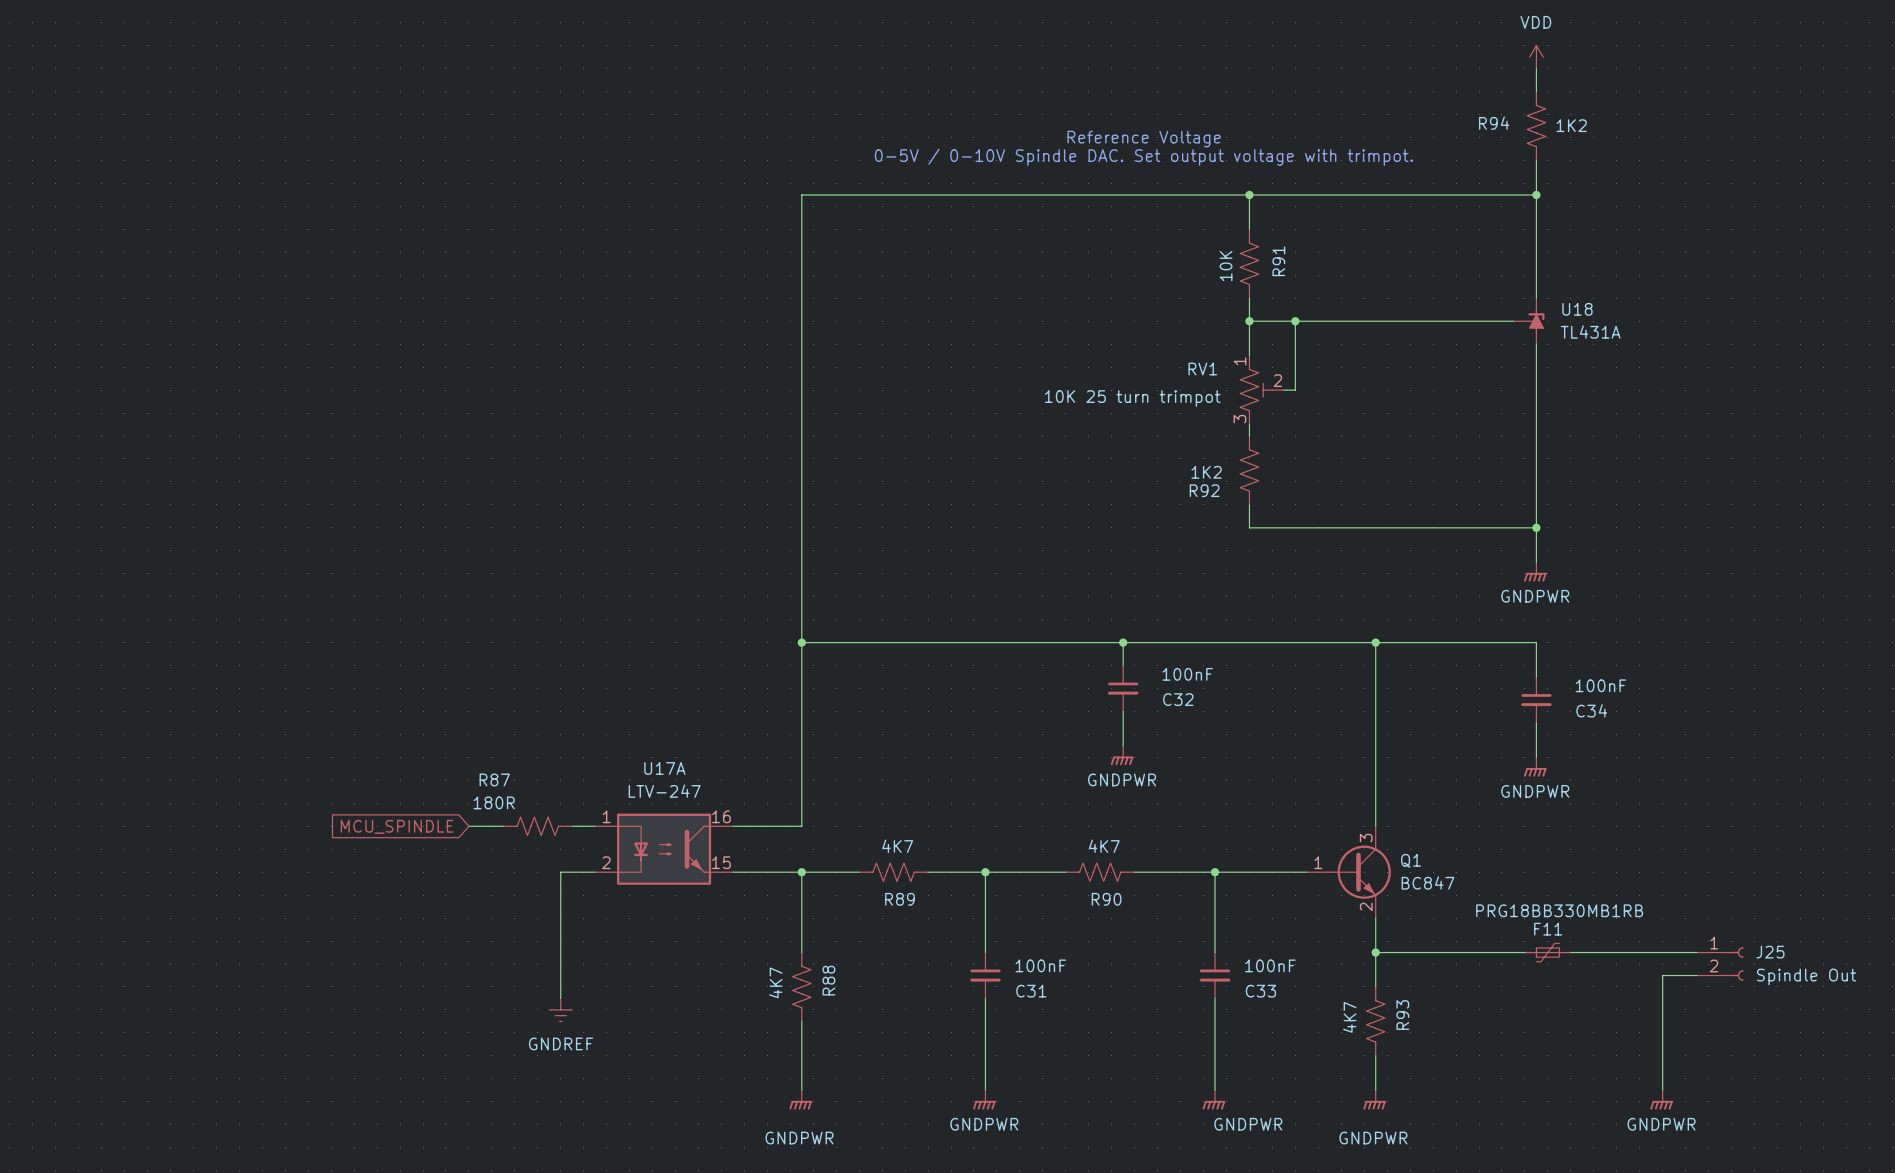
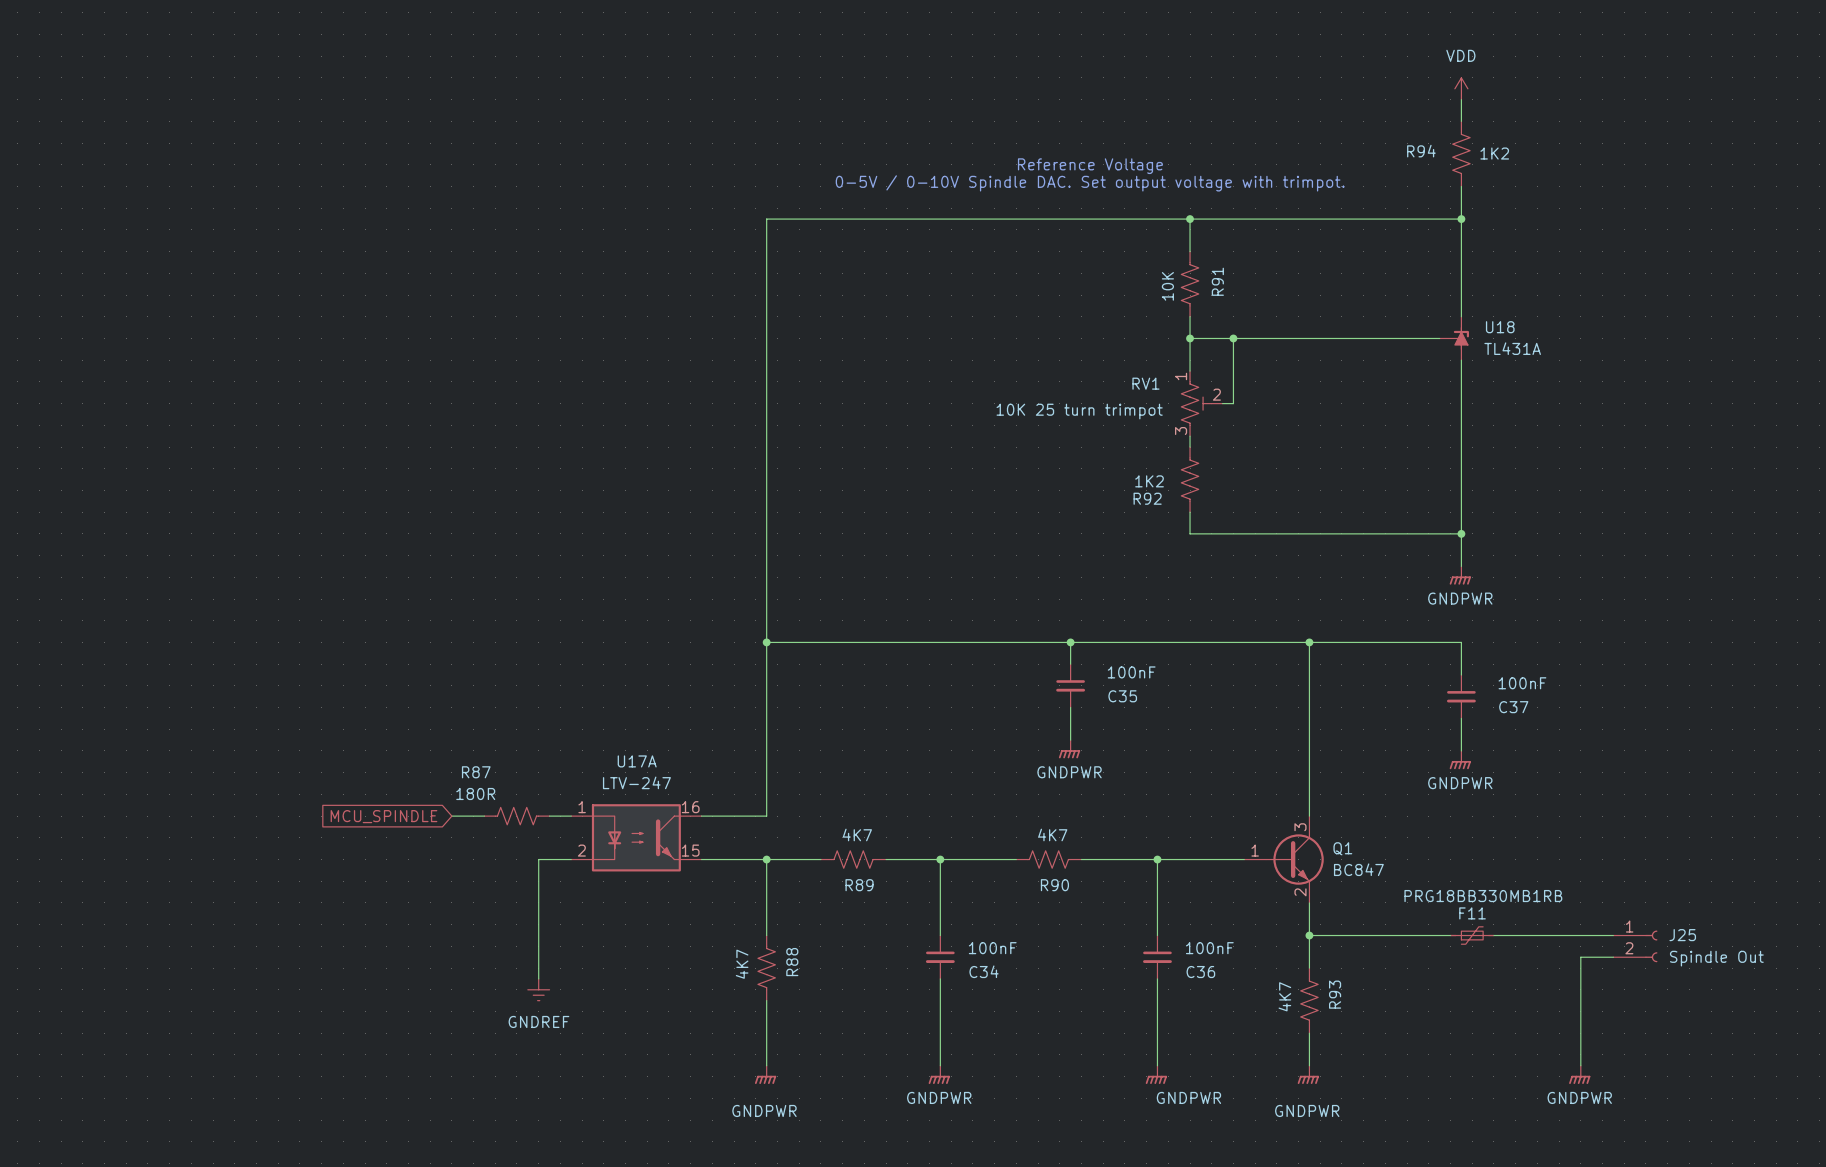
C32 name: C32 (1178, 699) -> C35 (1122, 696)
C34 name: C34 (1591, 710) -> C37 (1513, 707)
C31 name: C31 (1031, 991) -> C34 (984, 971)
C33 name: C33 (1260, 991) -> C36 (1200, 972)

